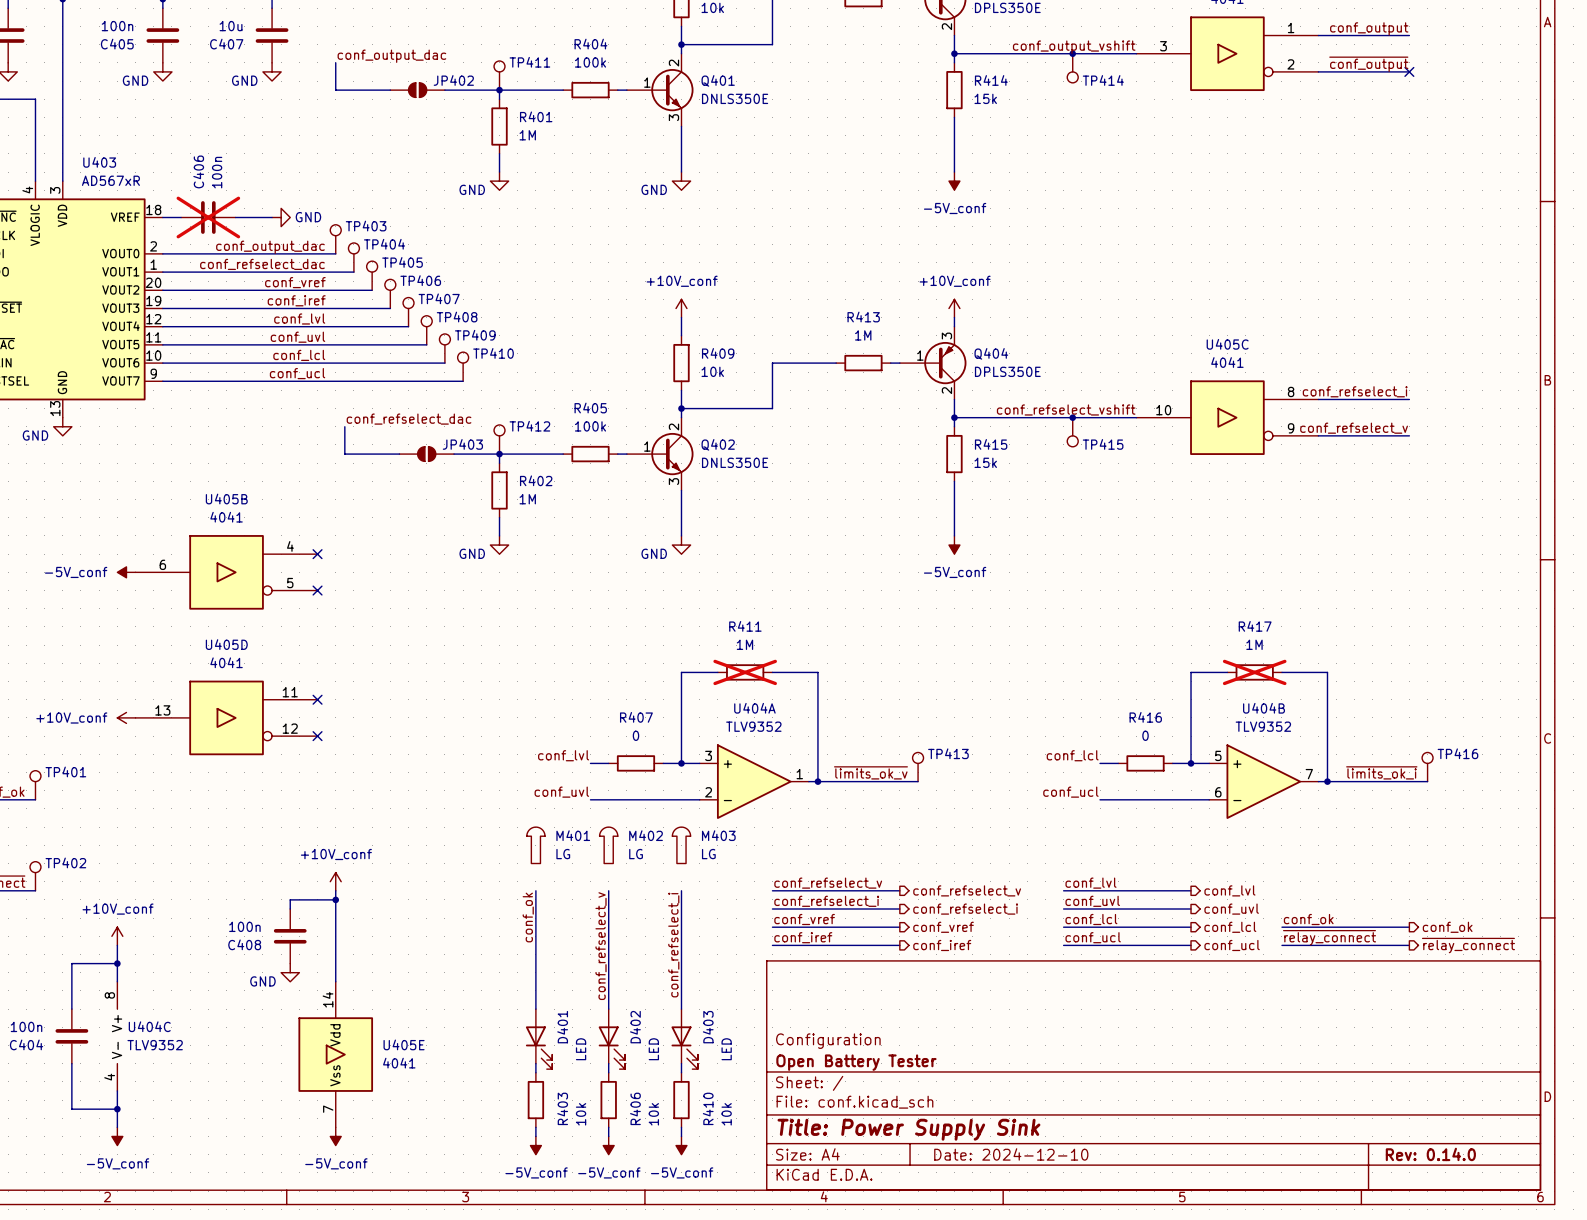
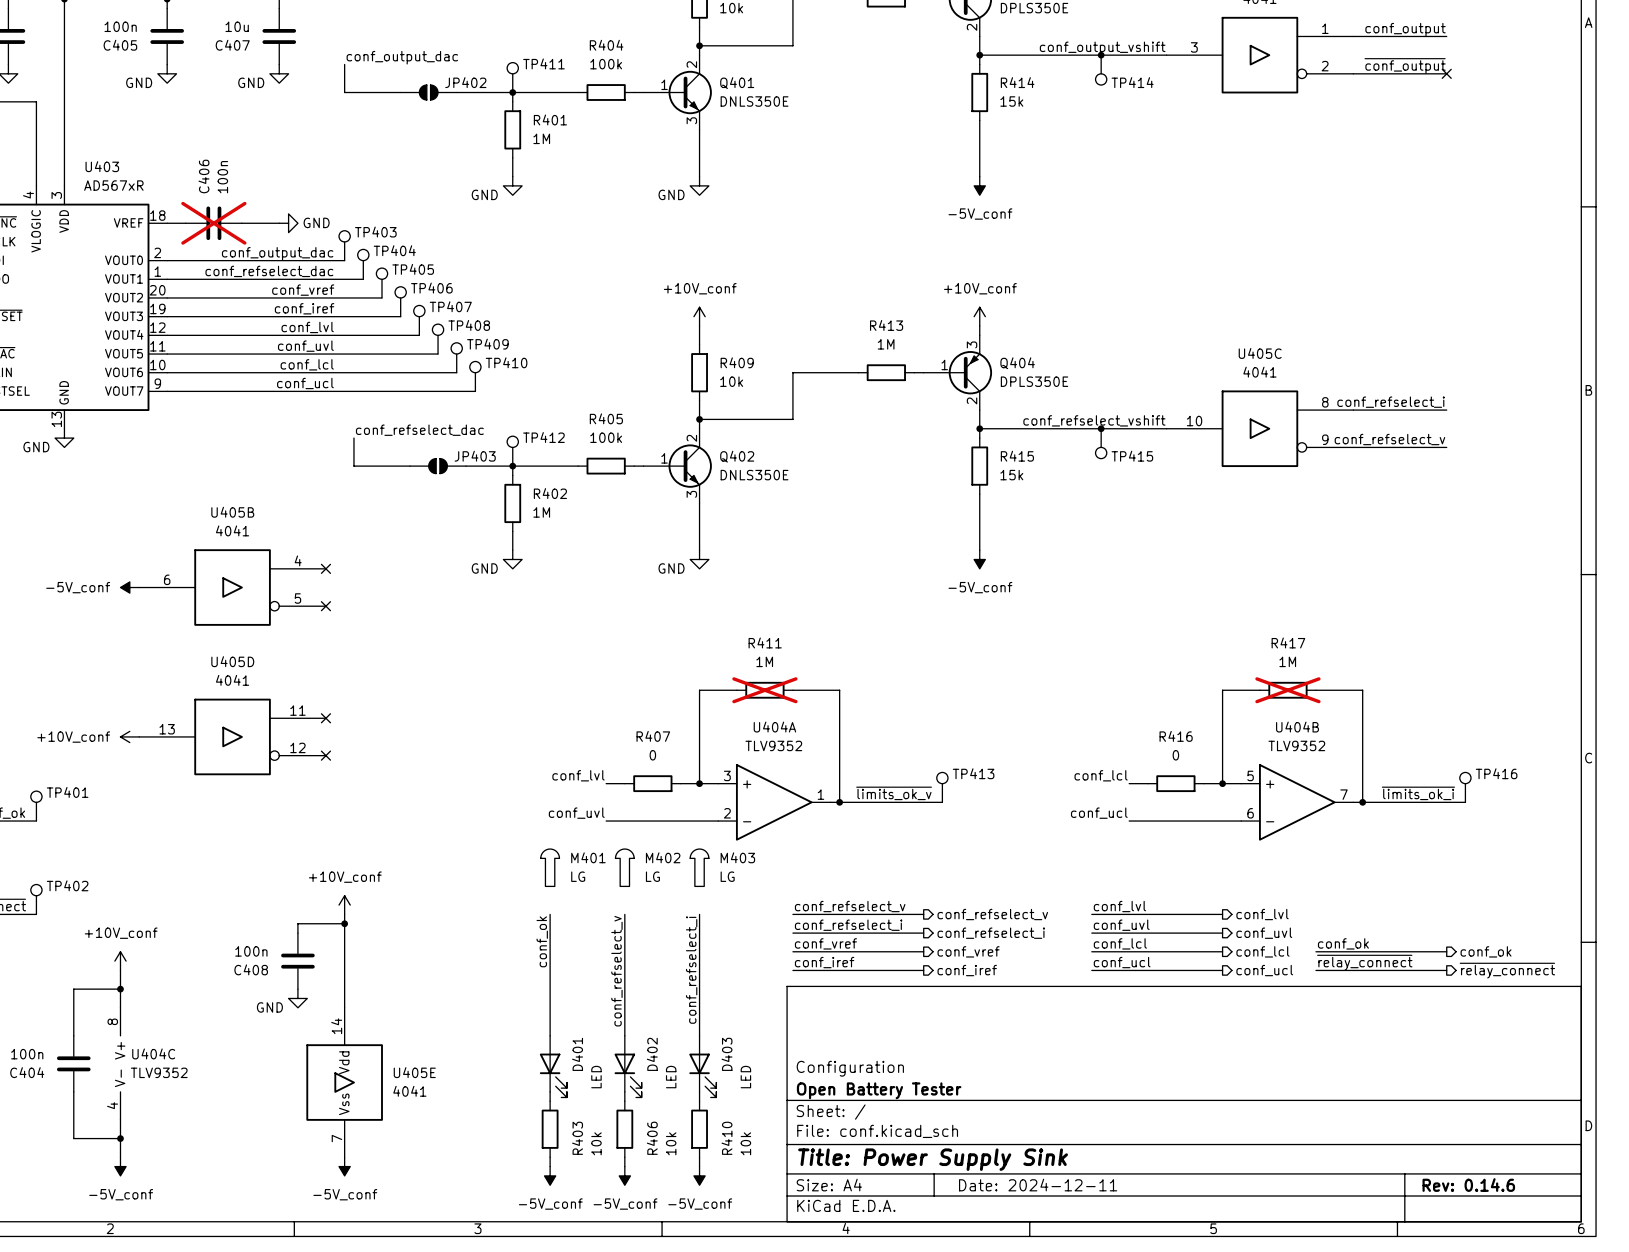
title block: Date: 2024-12-10 (1011, 1154) -> Date: 2024-12-11 (1038, 1185)
title block: Rev: 0.14.0 (1430, 1154) -> Rev: 0.14.6 (1468, 1185)

